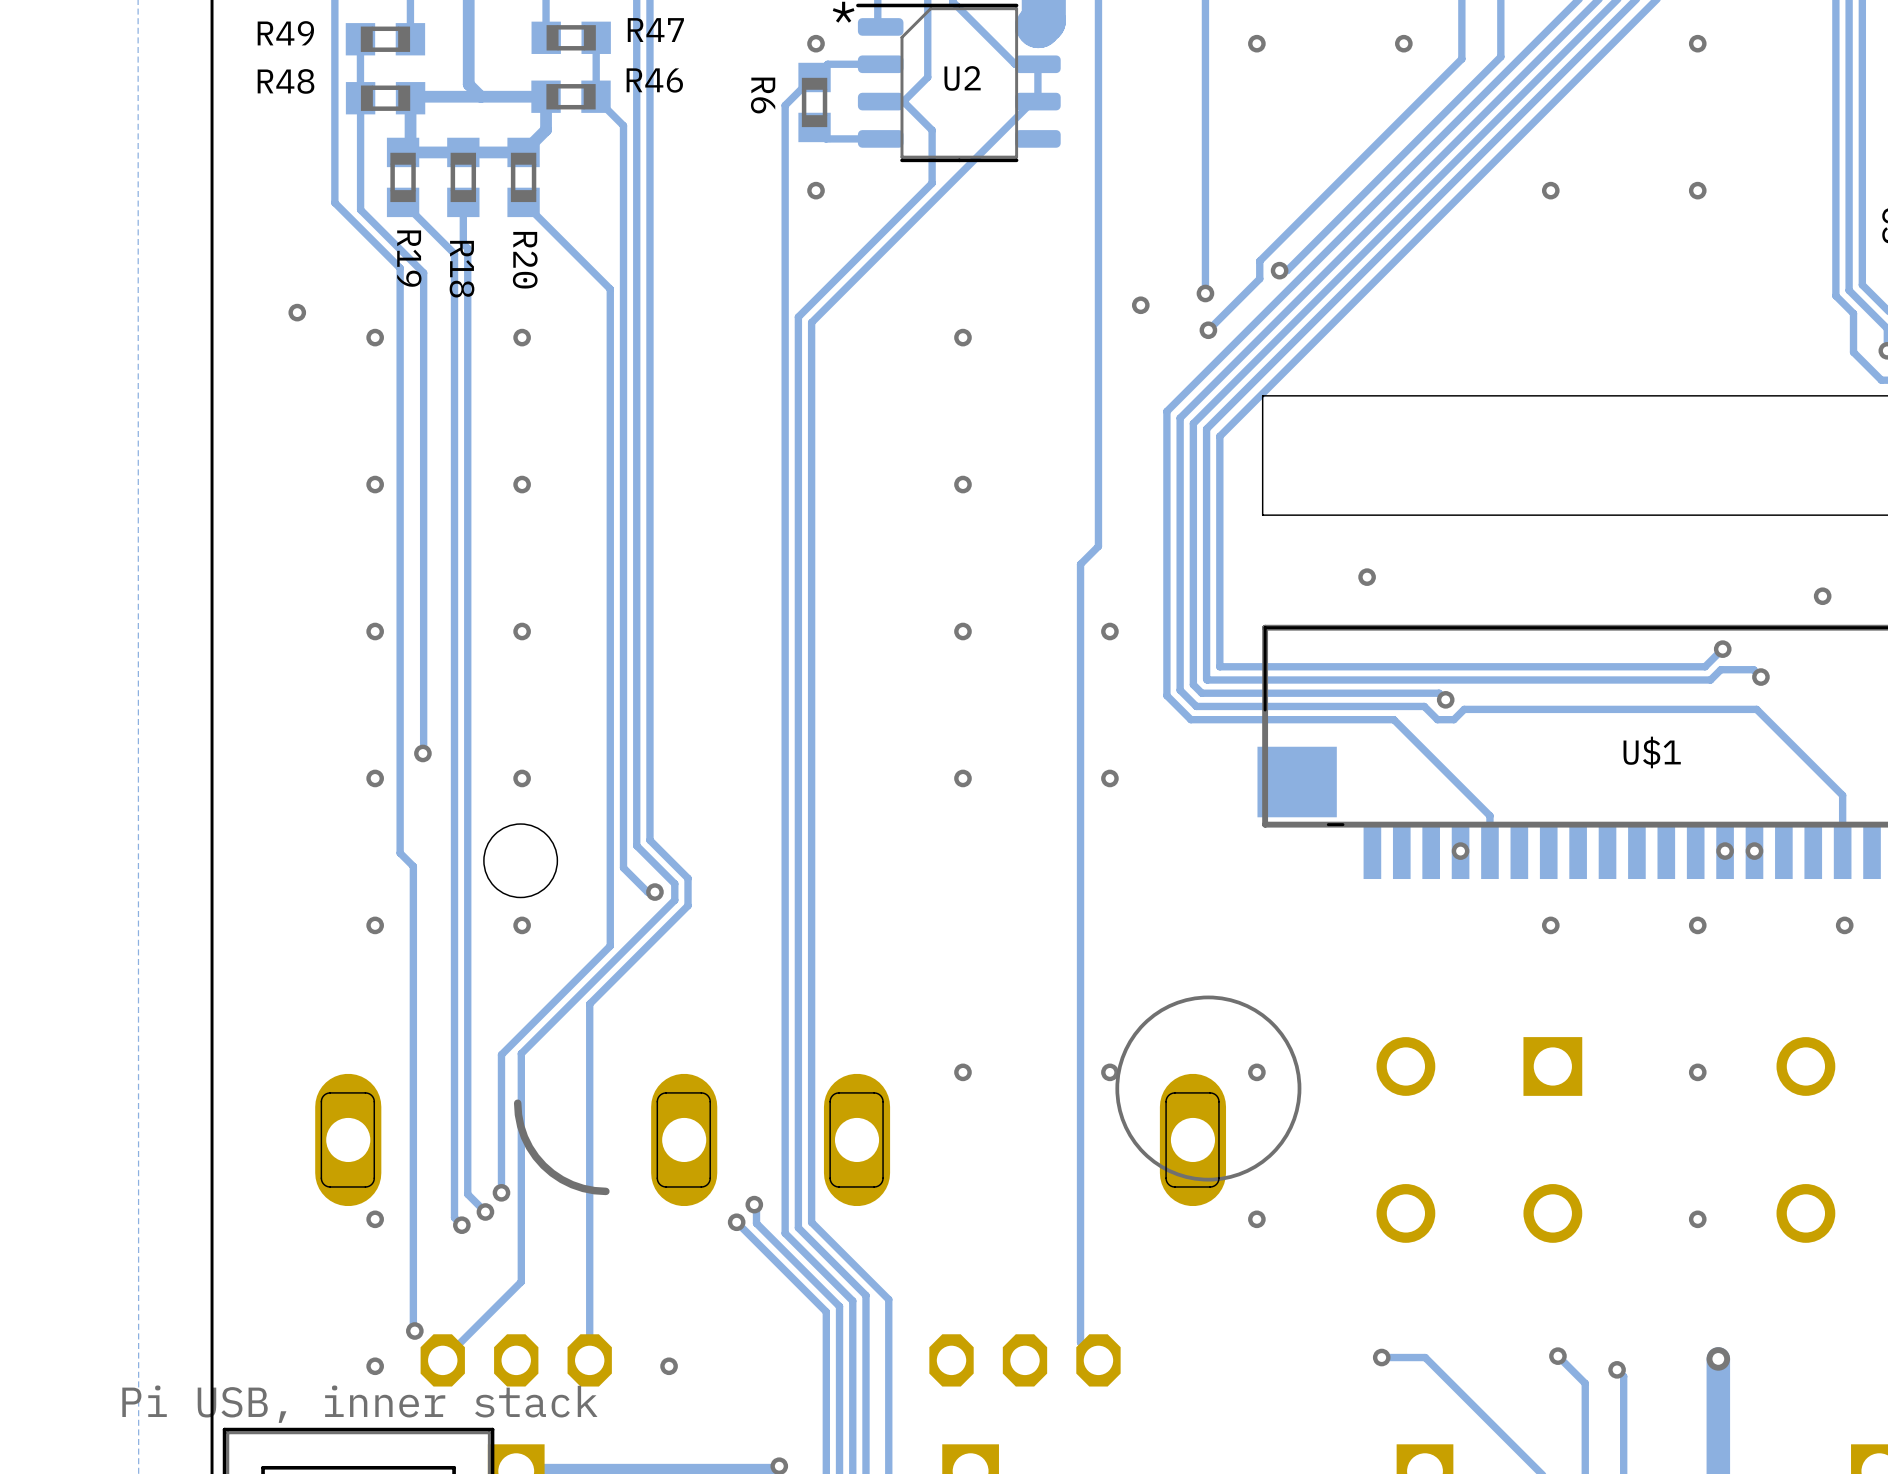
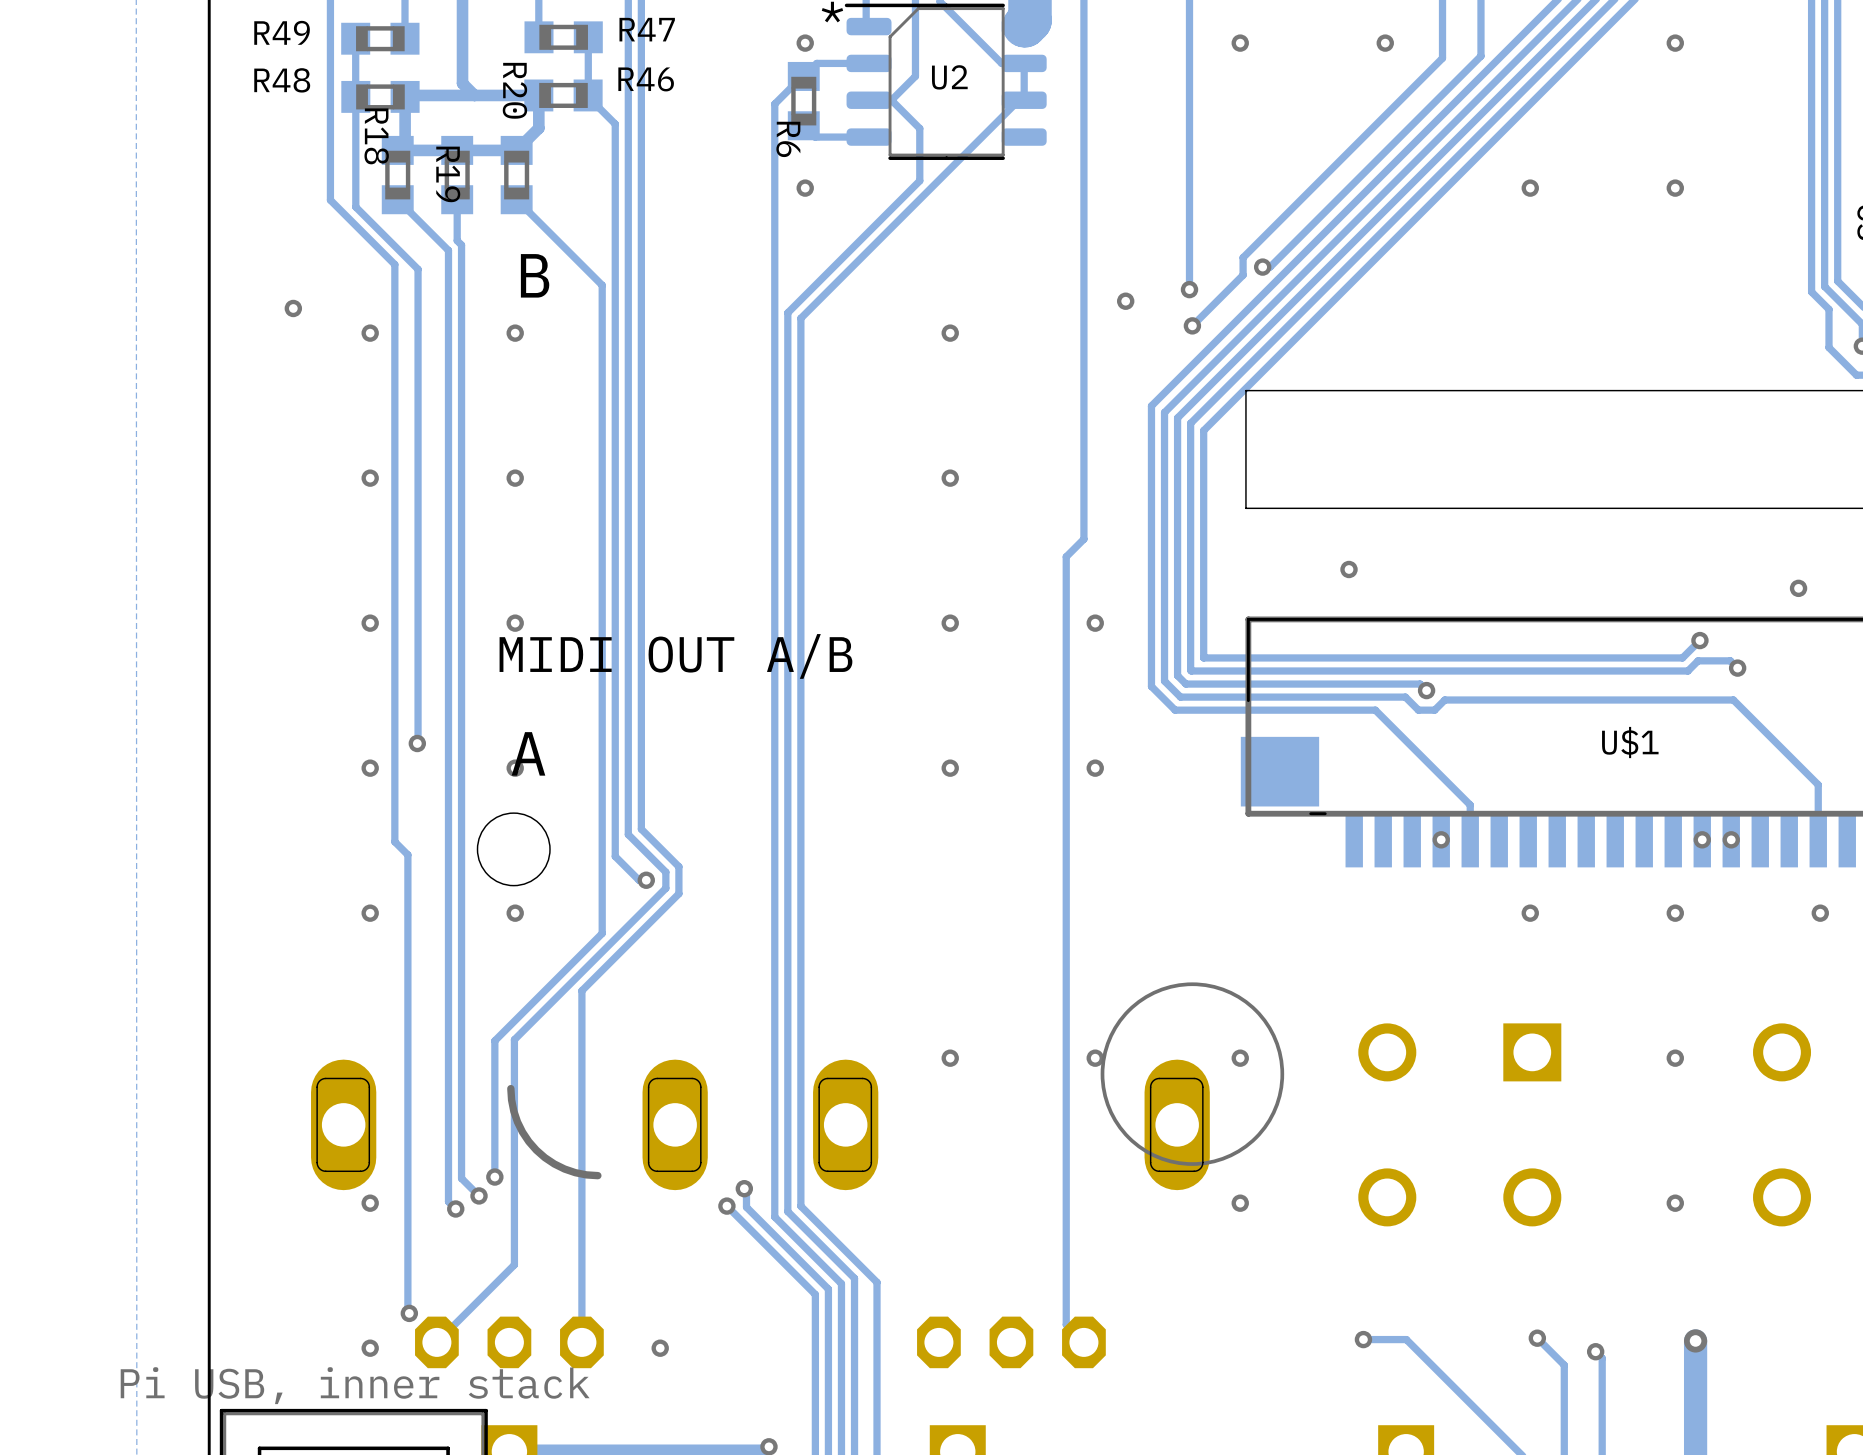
R6 name position: R6 (763, 95) -> R6 (788, 139)
R19 name position: R19 (409, 258) -> R19 (448, 174)
R20 name position: R20 (525, 260) -> R20 (514, 90)
R18 name position: R18 (462, 269) -> R18 (376, 136)
text: none -> B (535, 275)
text: none -> MIDI OUT A/B (675, 656)
text: none -> A (528, 753)

